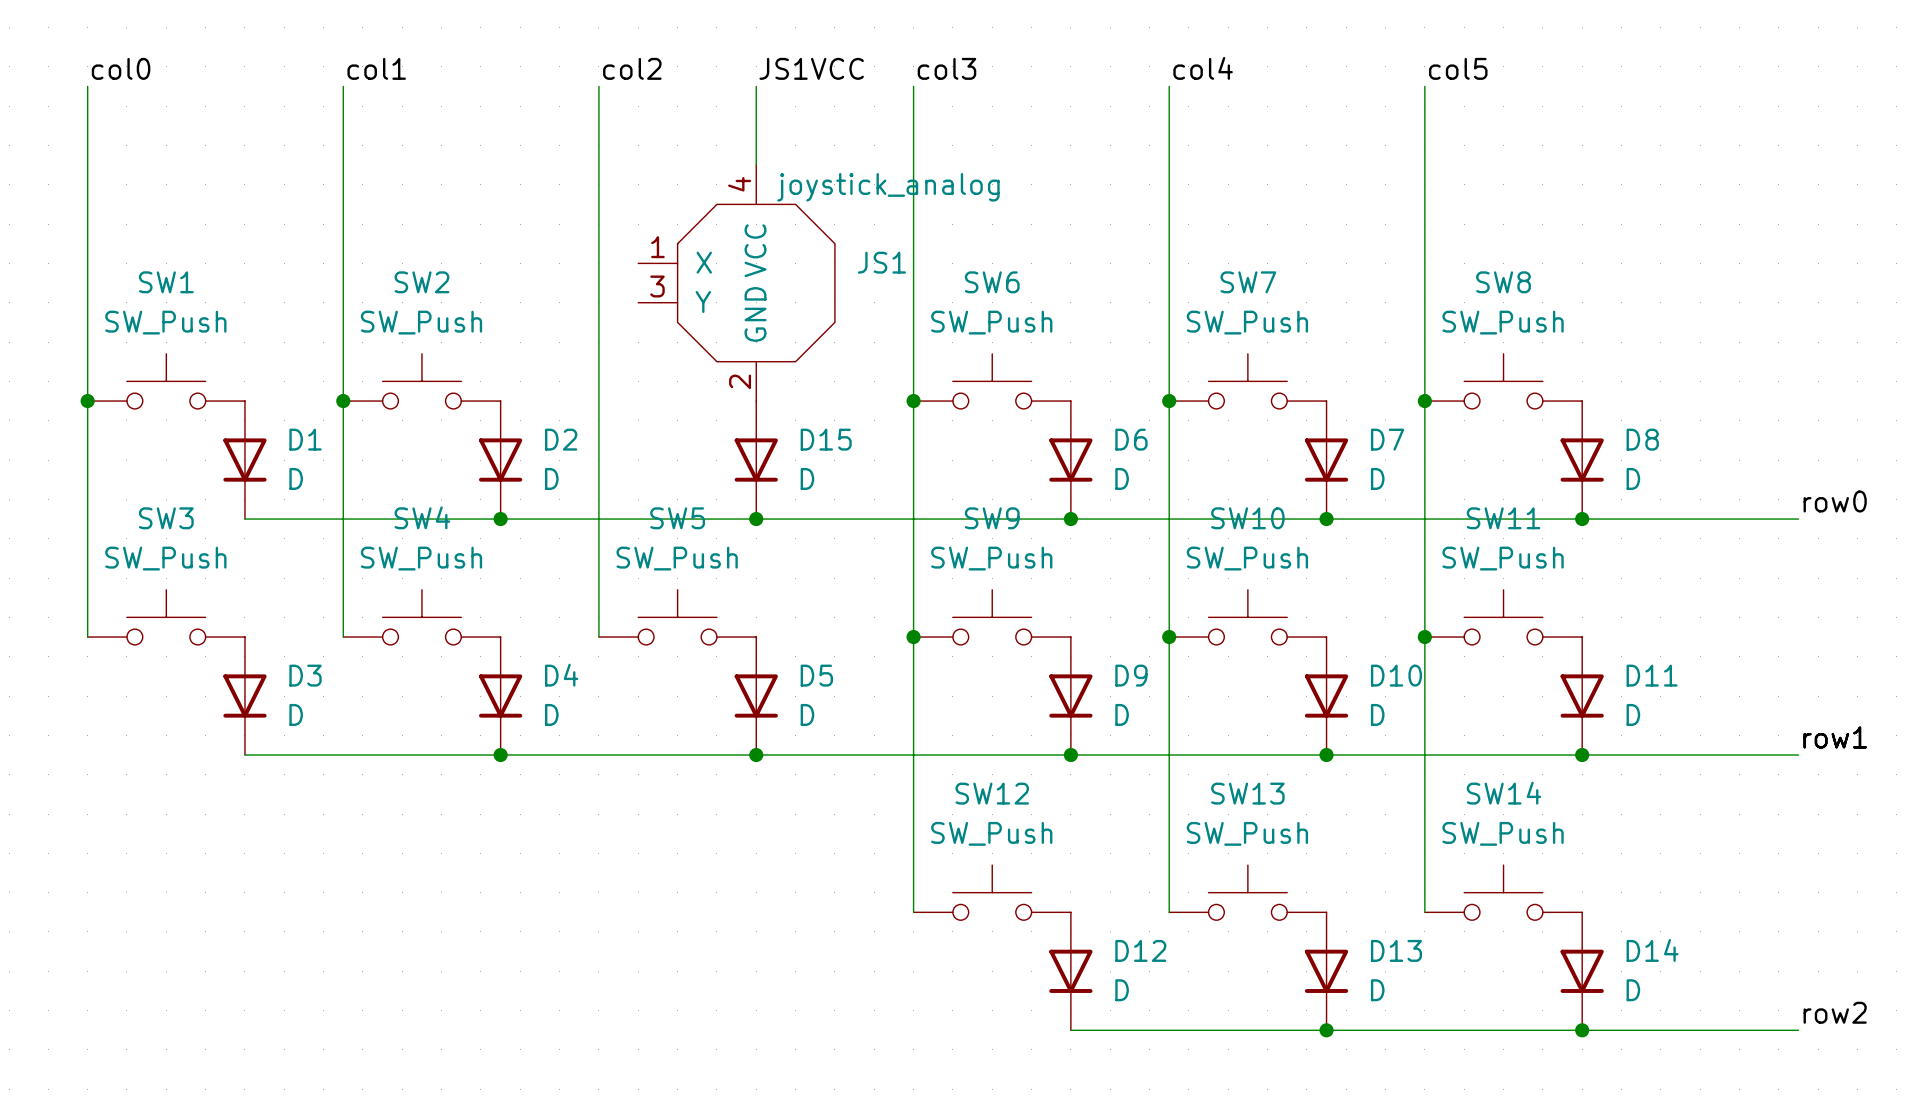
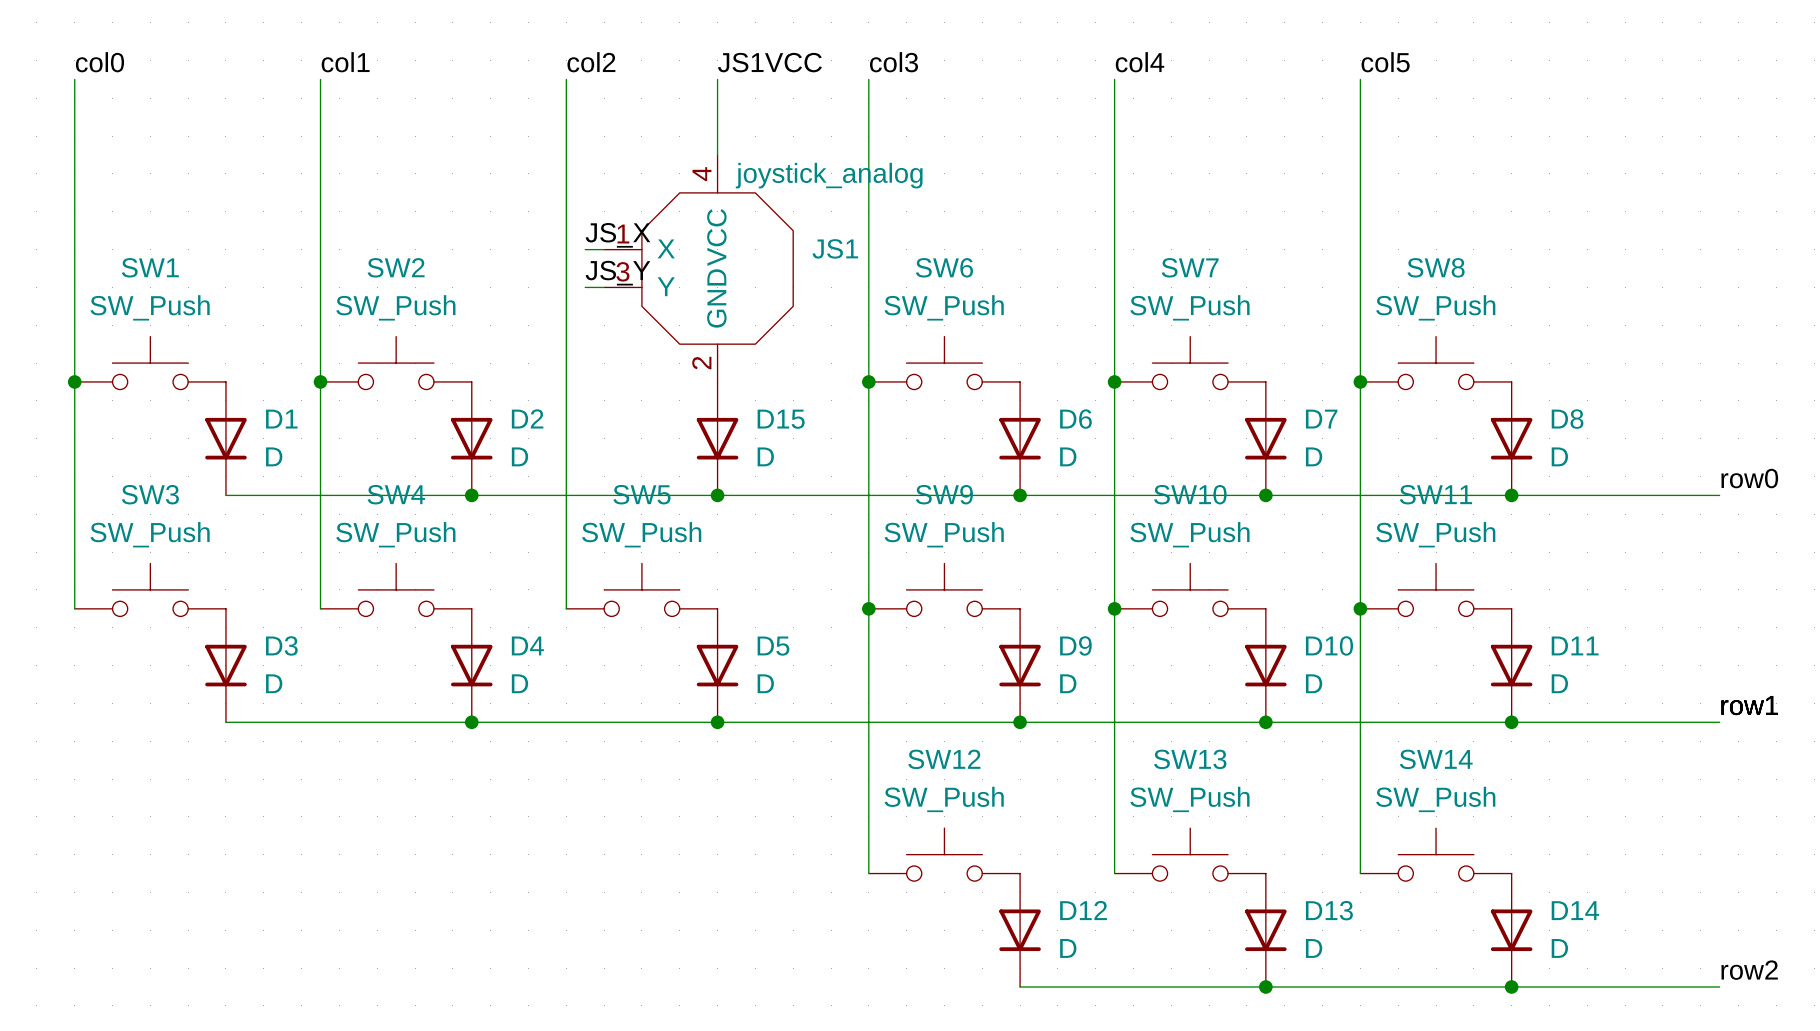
label: none -> JS_X (617, 235)
wire: none -> (585, 249) (604, 249)
label: none -> JS_Y (617, 273)
wire: none -> (585, 287) (604, 287)

